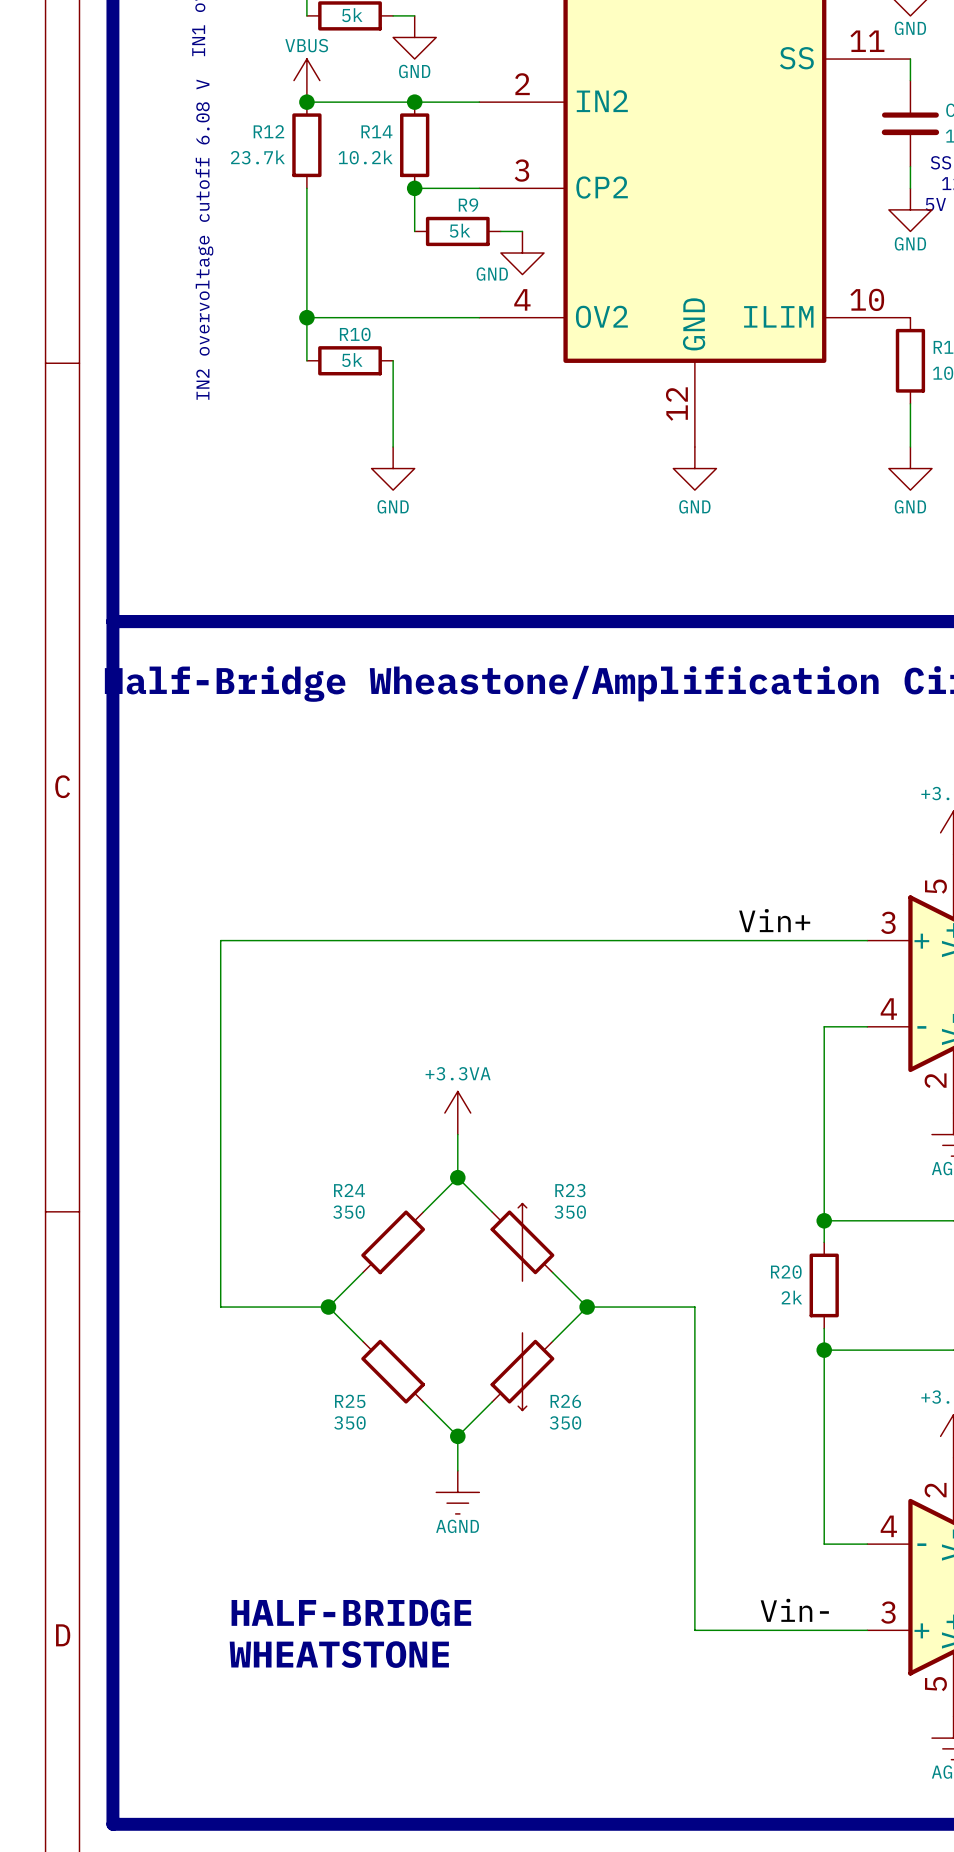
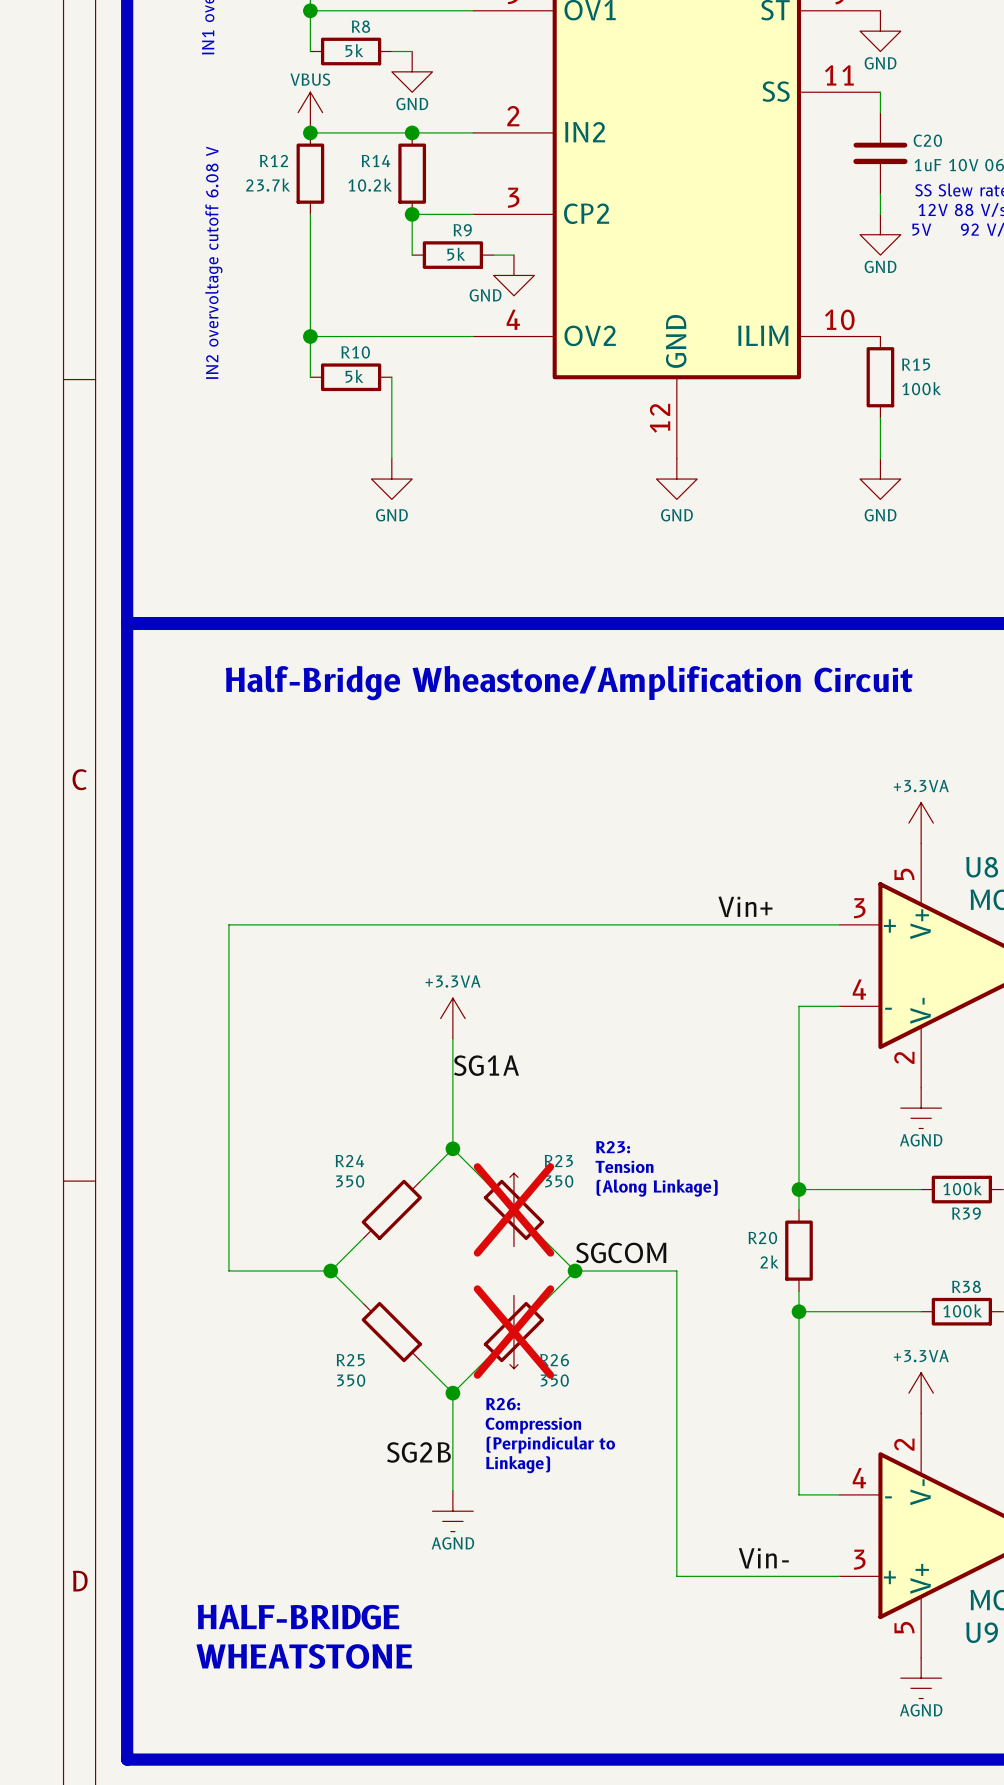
label: none -> SG1A (486, 1065)
power symbol position: +3.3VA (457, 1113) -> +3.3VA (452, 1018)
text: none -> R23: (613, 1147)
text: none -> Tension (624, 1166)
text: none -> (Along Linkage) (657, 1188)
R23 do-not-place cross: none -> (513, 1209)
label: none -> SGCOM (621, 1252)
R26 do-not-place cross: none -> (513, 1332)
text: none -> R26: (503, 1404)
text: none -> Compression (533, 1425)
wire: none -> (452, 1425) (452, 1490)
text: none -> (Perpindicular to (550, 1444)
power symbol position: AGND (457, 1492) -> AGND (452, 1511)
label: none -> SG2B (418, 1452)
text: none -> Linkage) (518, 1464)
text position: HALF-BRIDGE (351, 1612) -> HALF-BRIDGE (298, 1617)
text position: WHEATSTONE (339, 1654) -> WHEATSTONE (304, 1656)

